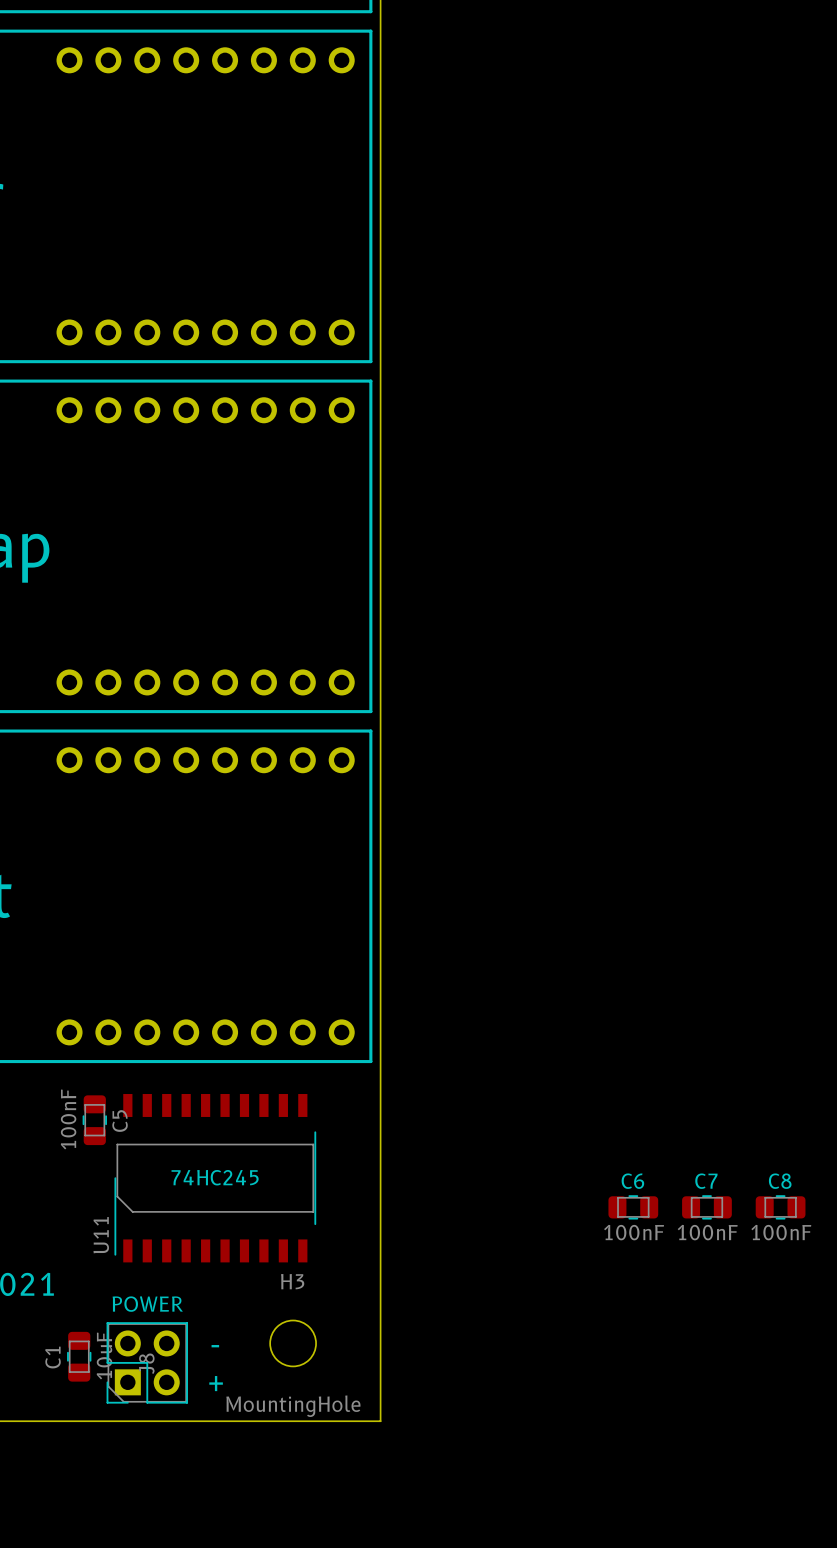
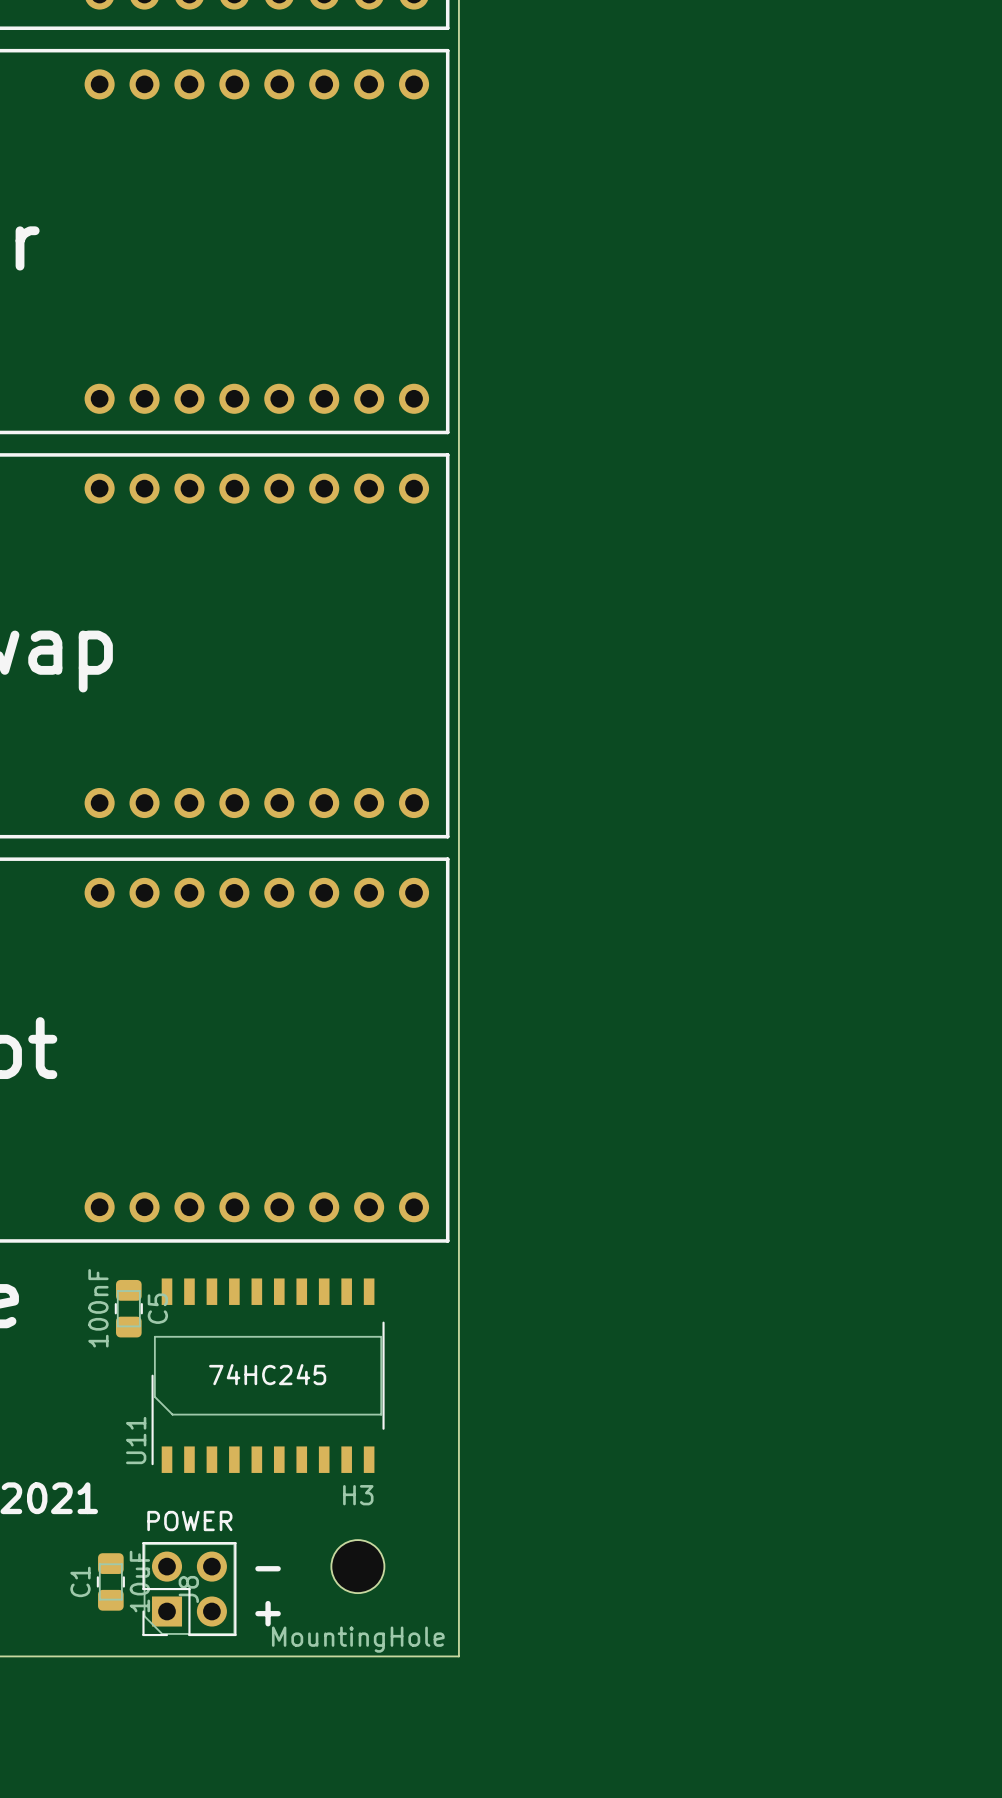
C6: 100nF (633, 1207) -> none
C7: 100nF (706, 1207) -> none
C8: 100nF (780, 1207) -> none

